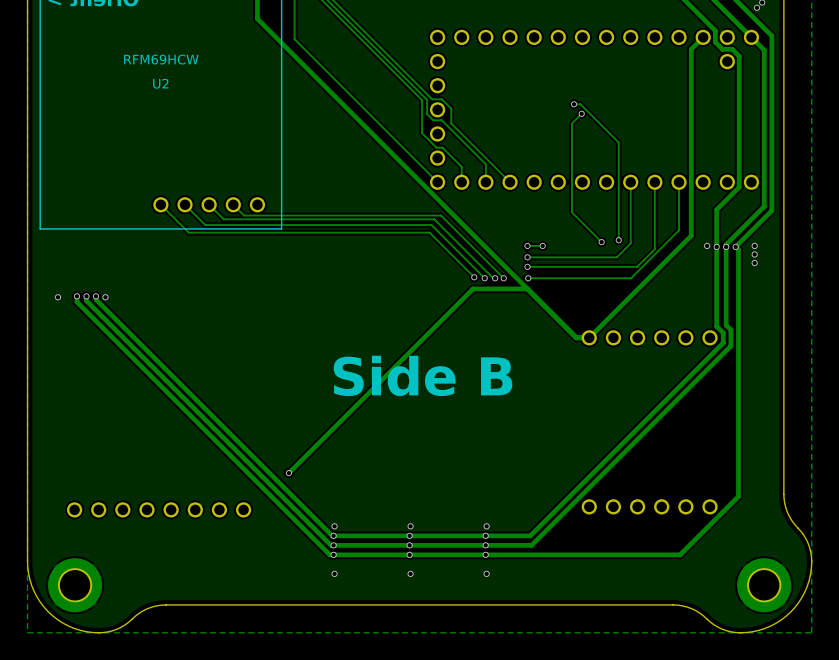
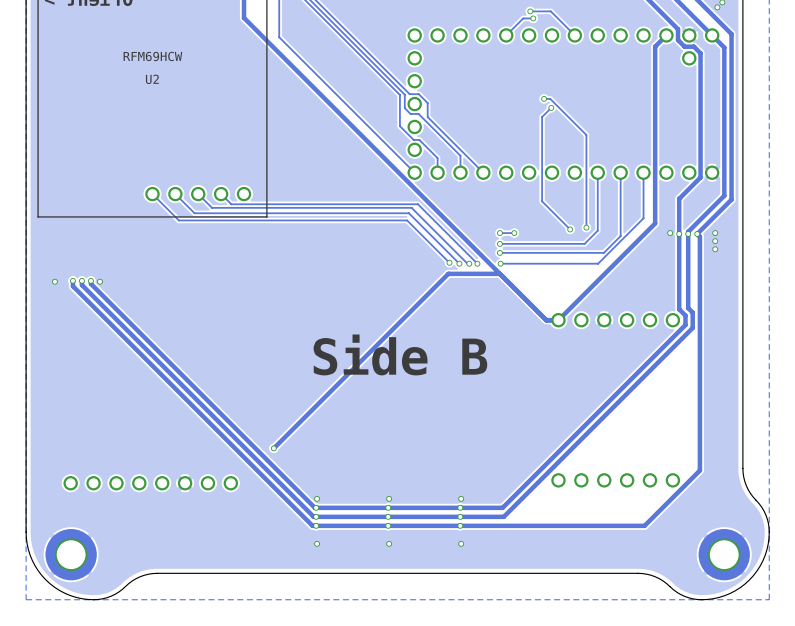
track: none -> (530, 11) (550, 11) (574, 35)
via: none -> (530, 11)
track: none -> (533, 18) (523, 18) (506, 35)
via: none -> (533, 18)

